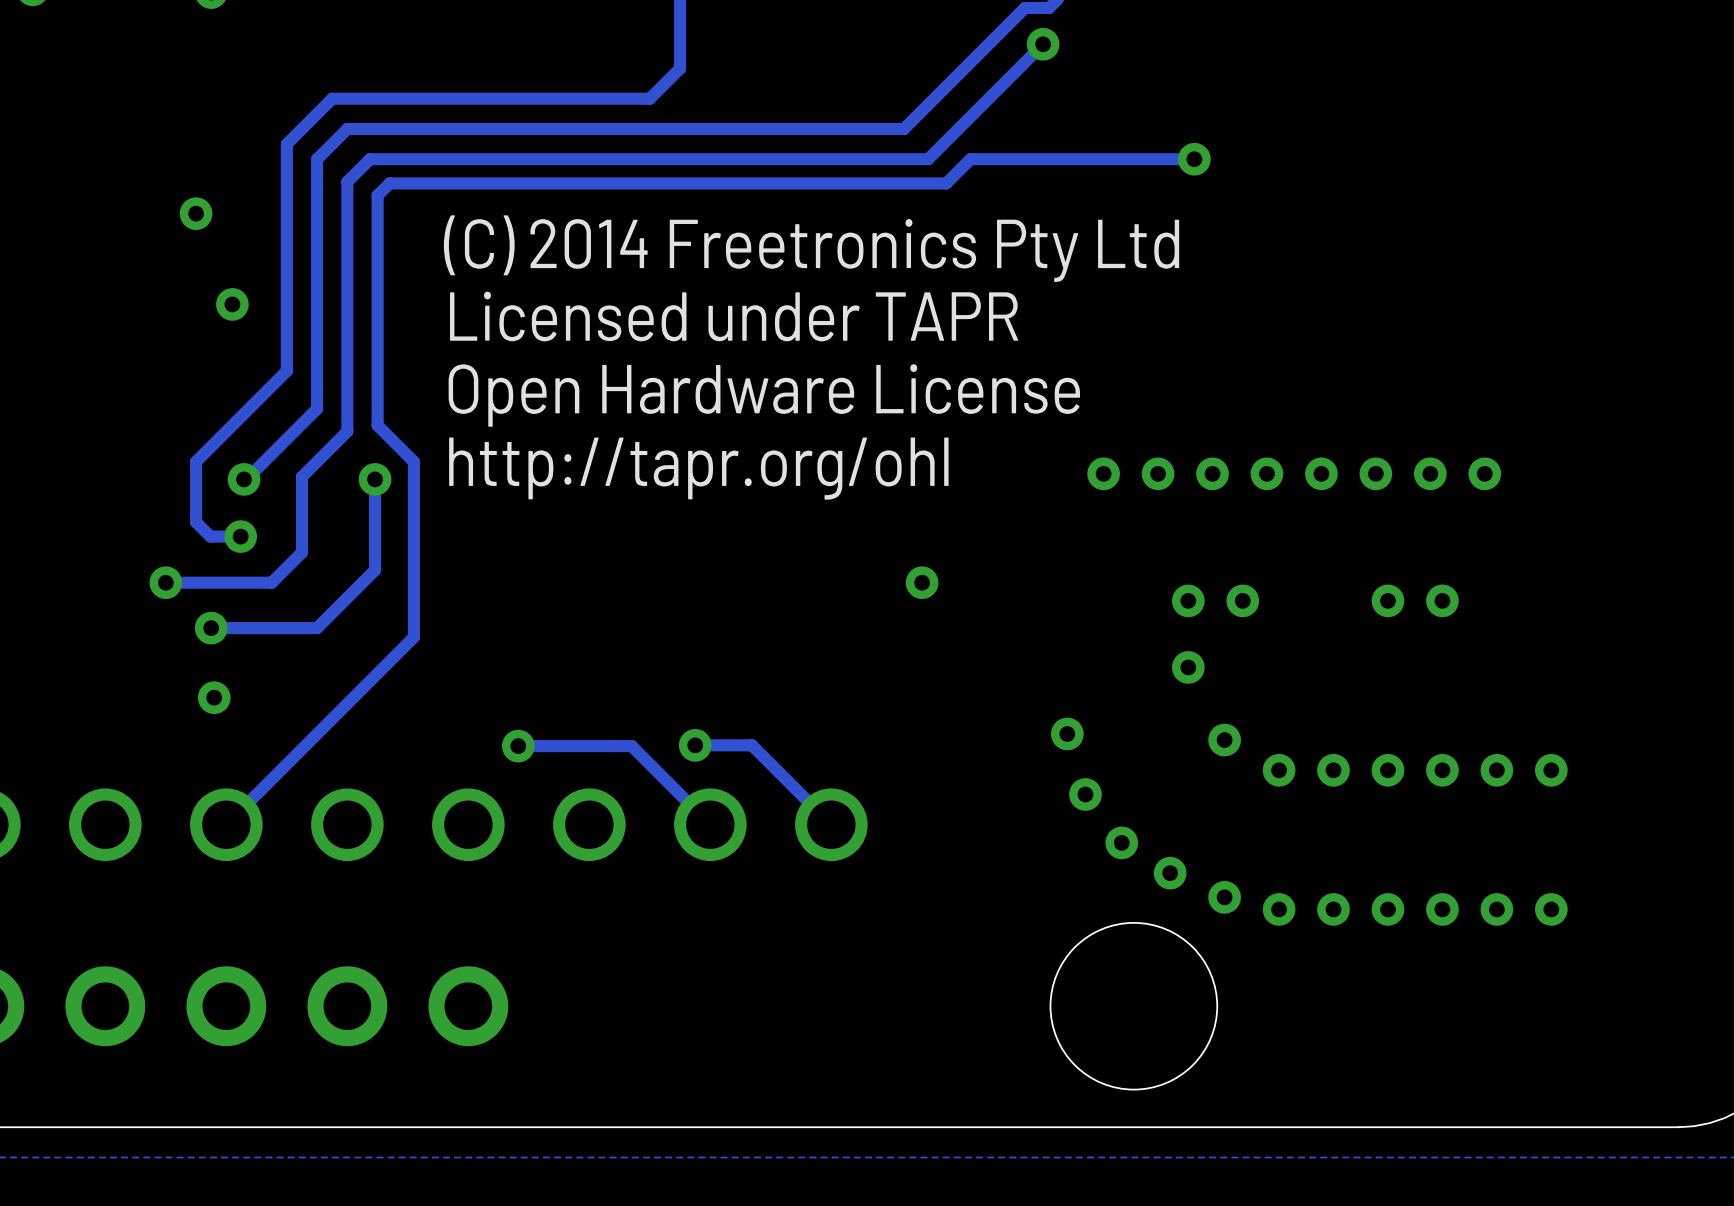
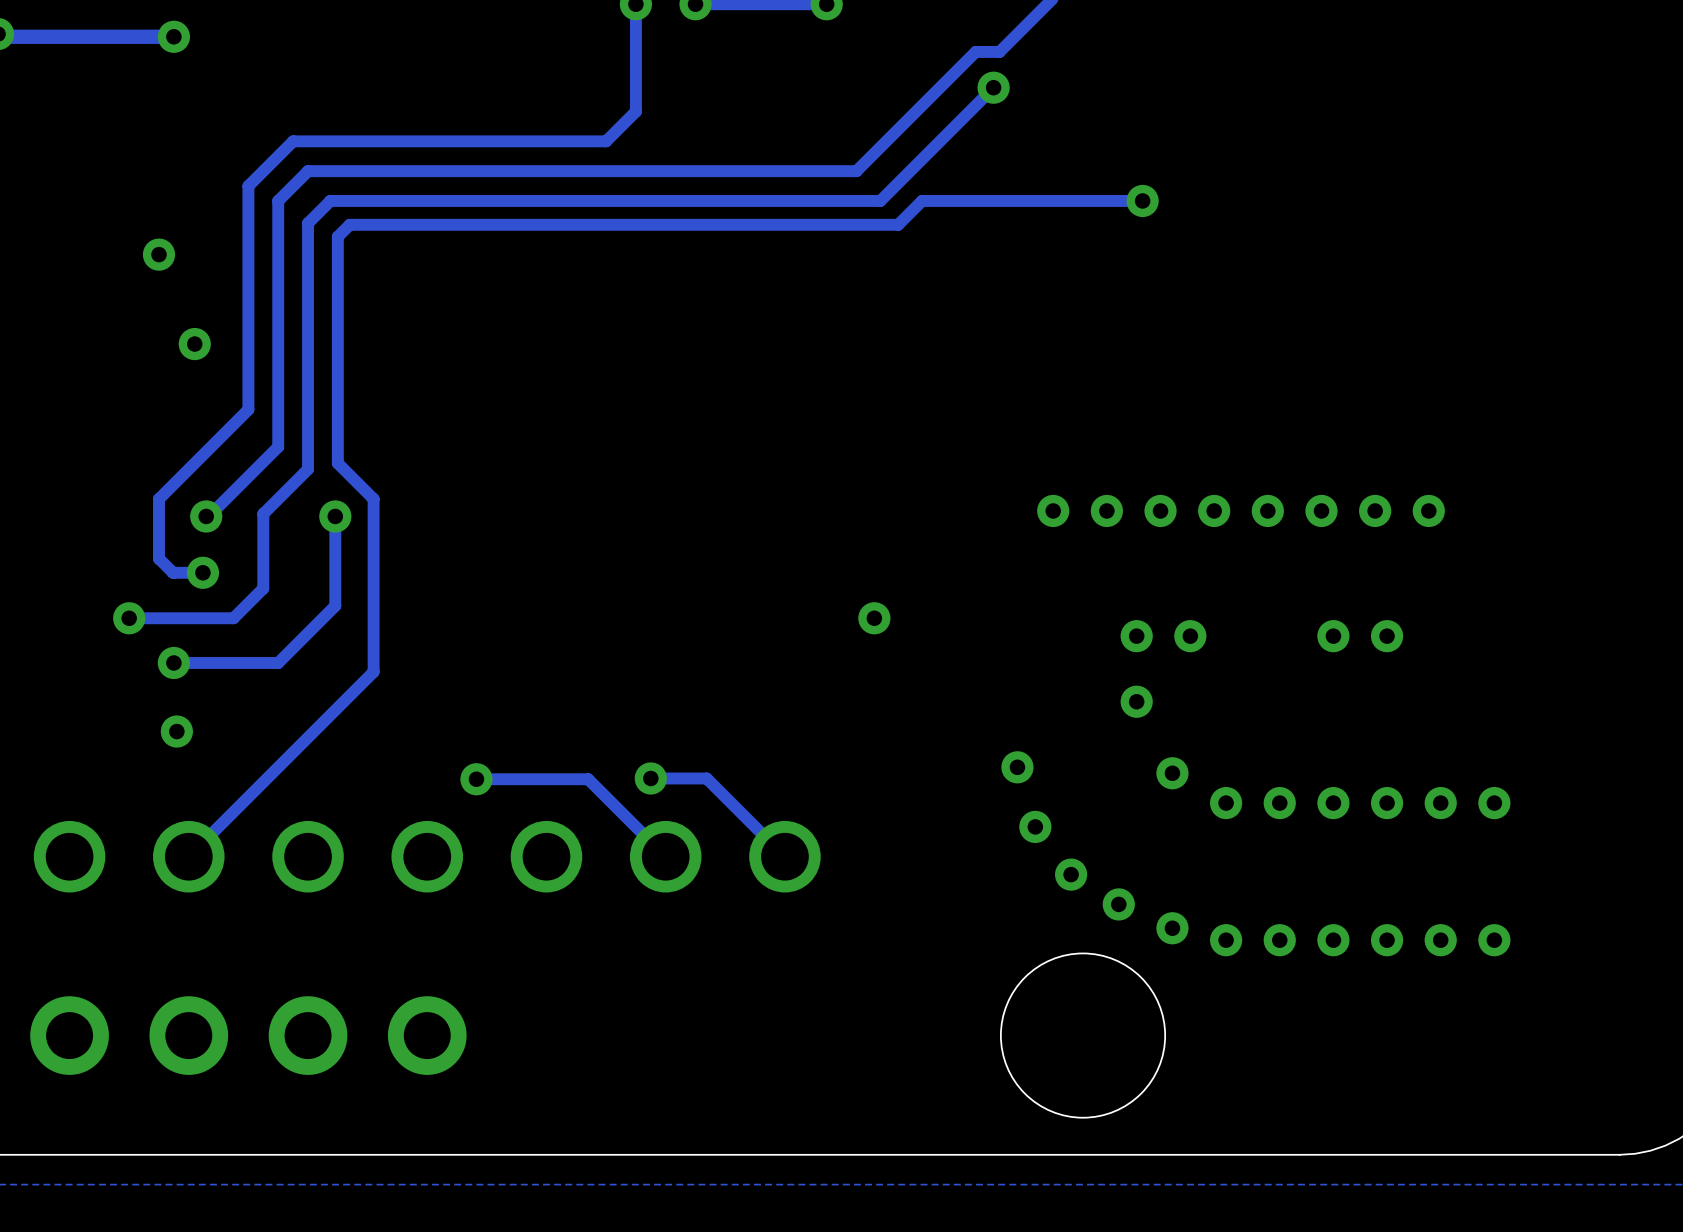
text: (C) 2014 Freetronics Pty Ltd (811, 248) -> none
text: Licensed under TAPR (734, 316) -> none
text: Open Hardware License (764, 395) -> none
text: http://tapr.org/ohl (698, 468) -> none

